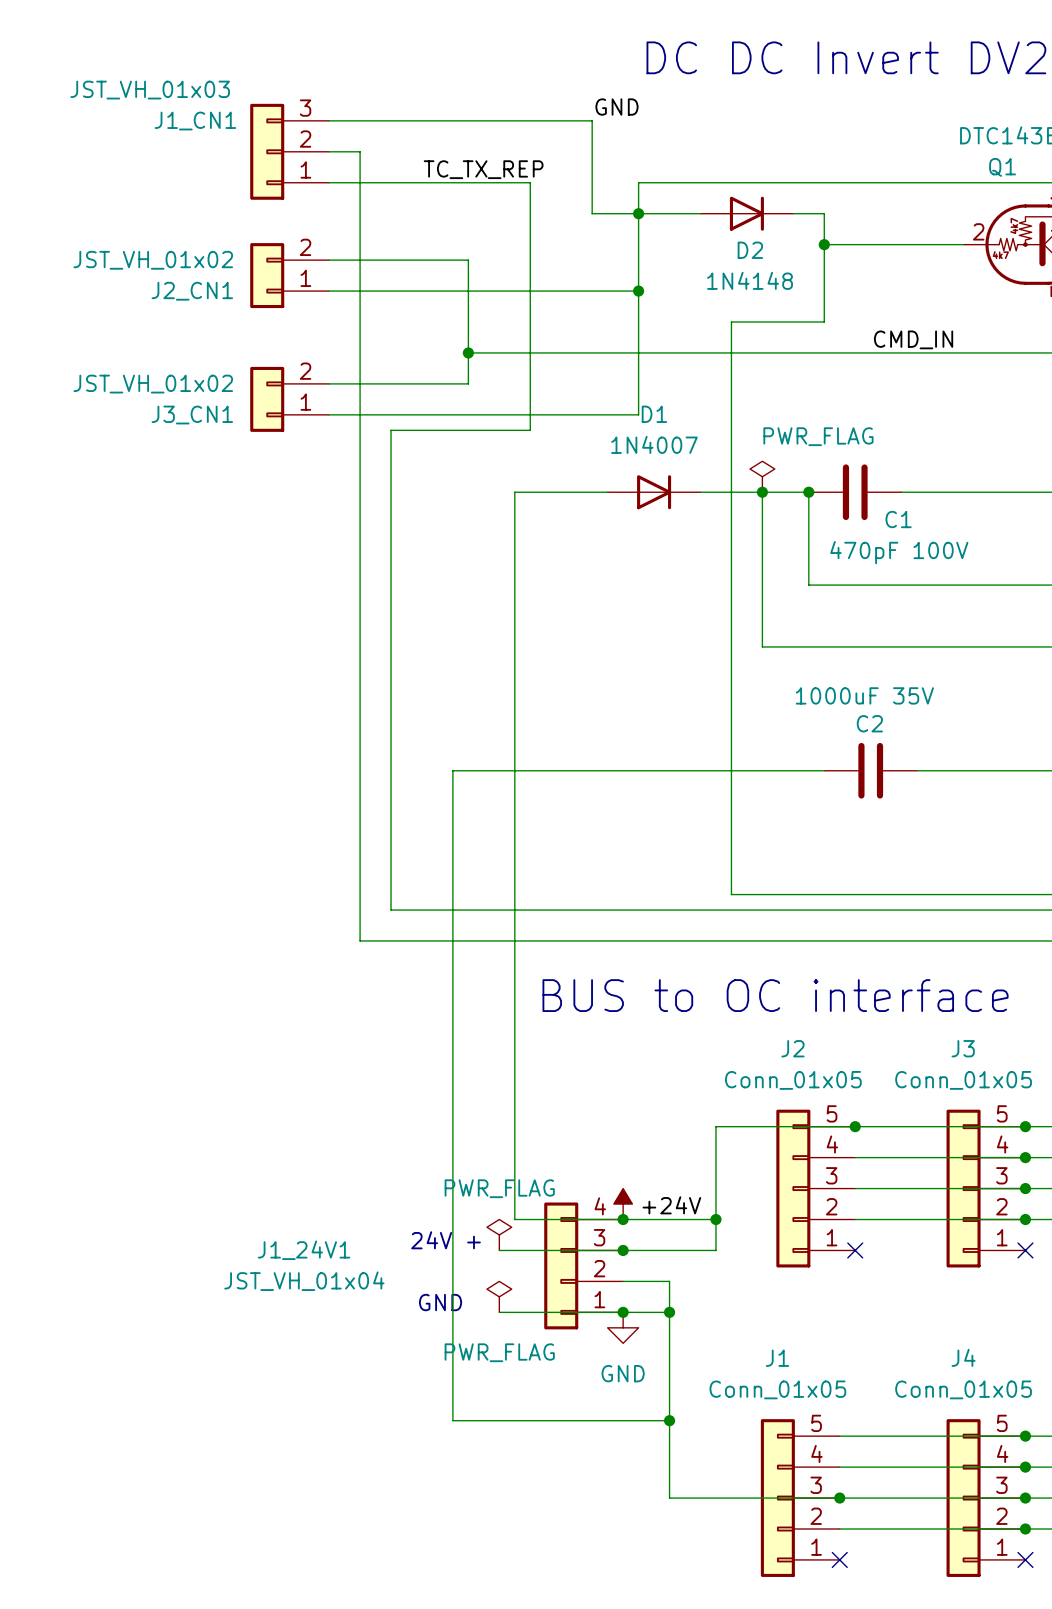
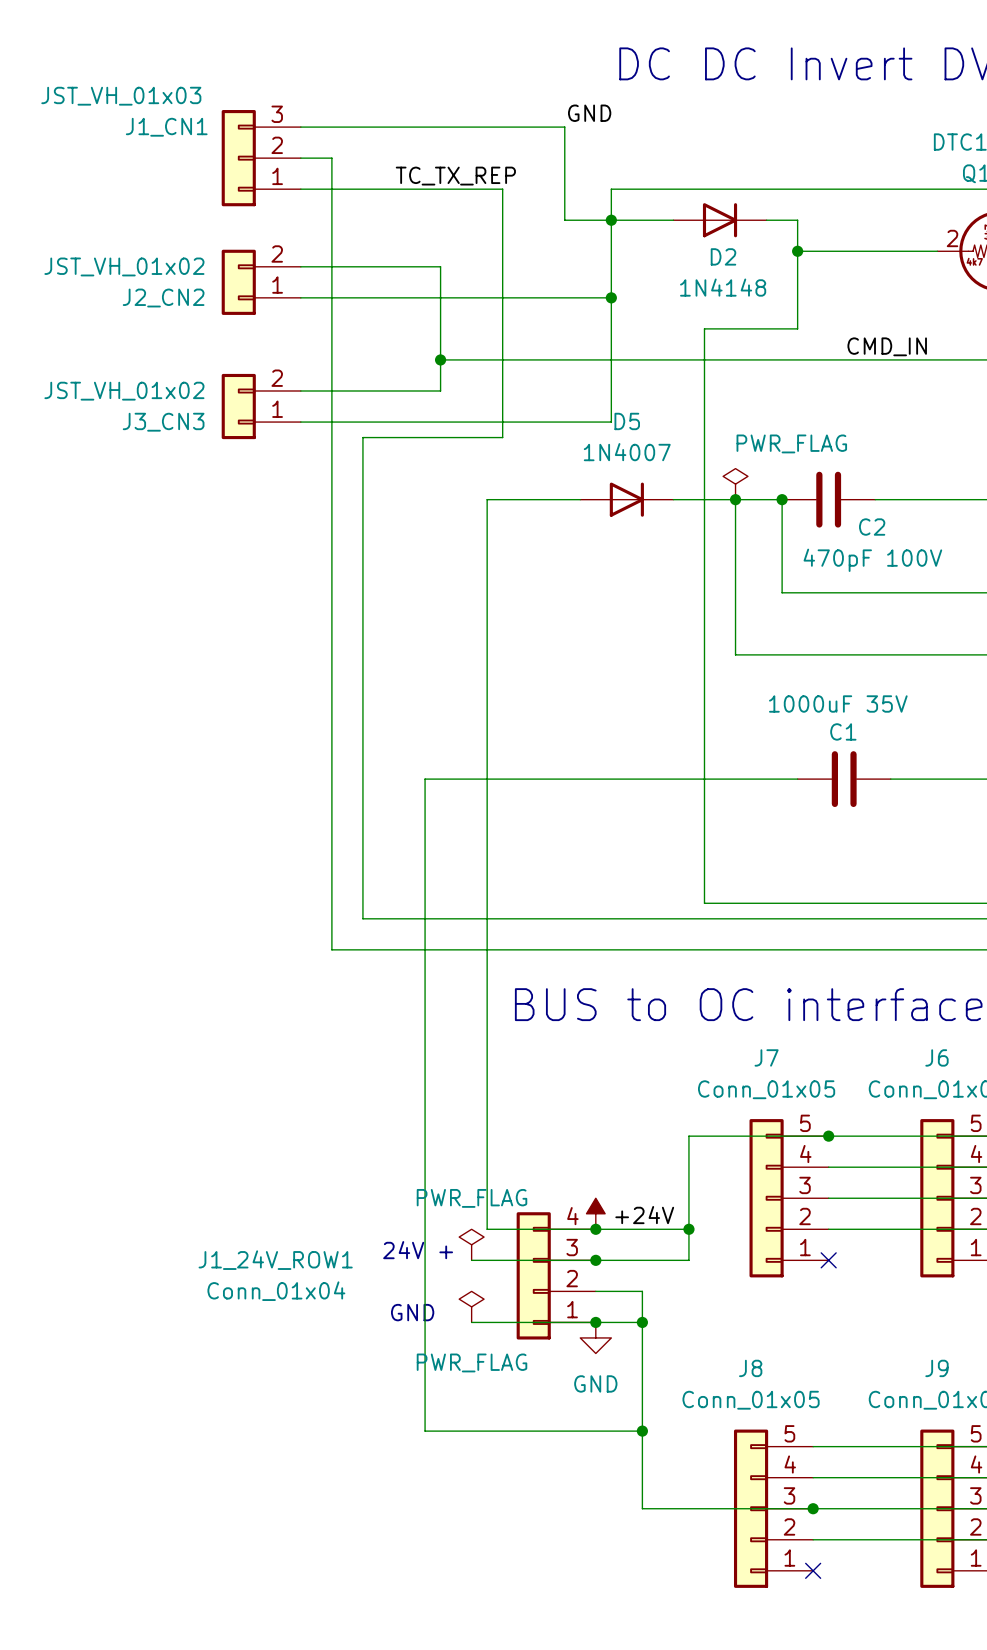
J2_CN1 name: J2_CN1 (192, 291) -> J2_CN2 (163, 298)
D1 name: D1 (654, 414) -> D5 (627, 421)
J3_CN1 name: J3_CN1 (192, 415) -> J3_CN3 (163, 422)
C1 name: C1 (898, 519) -> C2 (872, 527)
C2 name: C2 (869, 723) -> C1 (843, 731)
J2 name: J2 (792, 1048) -> J7 (766, 1057)
J3 name: J3 (963, 1048) -> J6 (936, 1057)
J1_24V1 name: J1_24V1 (303, 1250) -> J1_24V_ROW1 (275, 1260)
J1_24V1 value: JST_VH_01x04 (304, 1281) -> Conn_01x04 (276, 1291)
J4 name: J4 (963, 1357) -> J9 (936, 1368)
J1 name: J1 (777, 1358) -> J8 (750, 1368)

